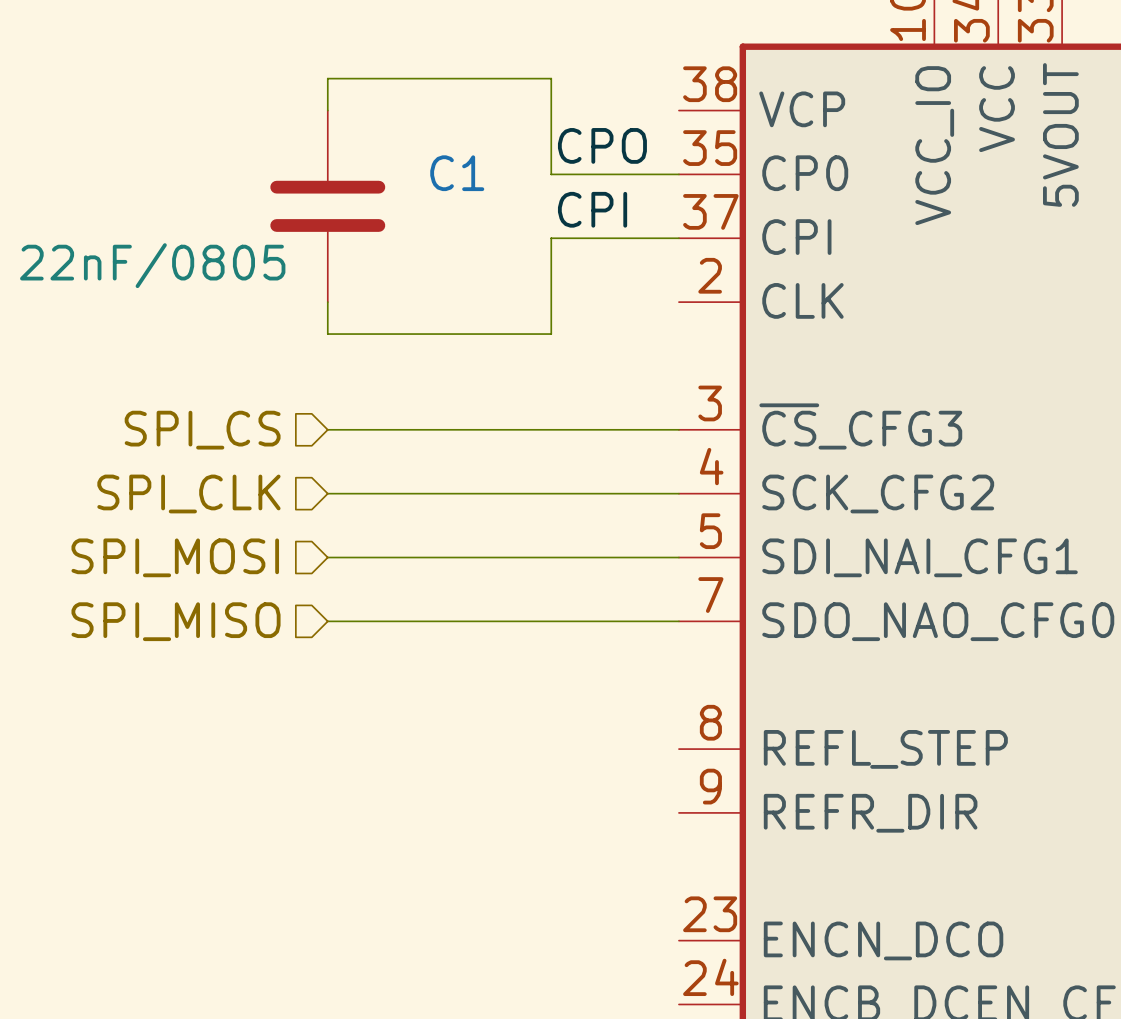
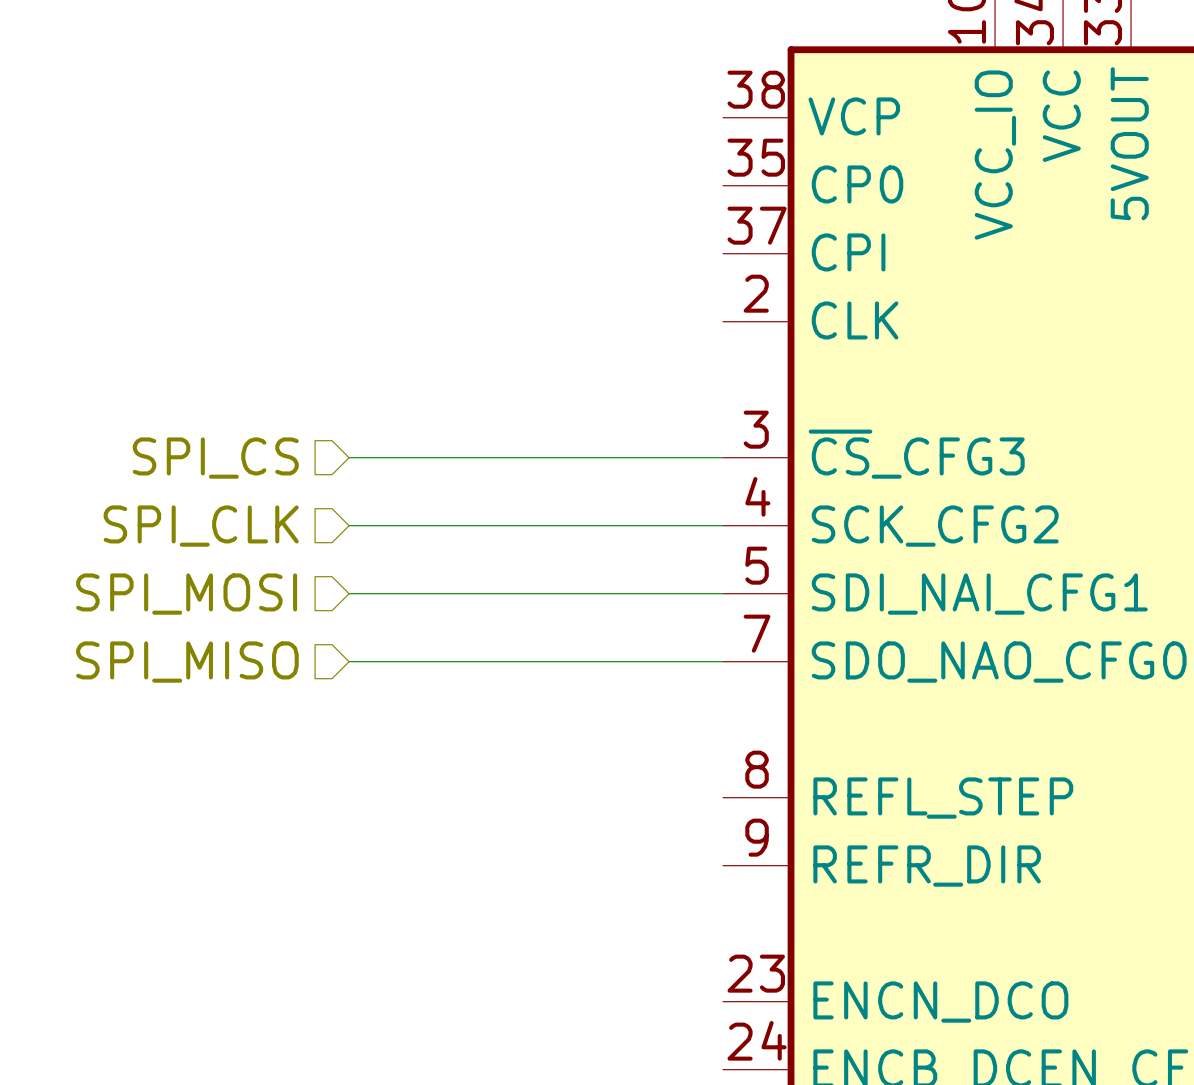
wire: (327, 110) (327, 78) (551, 78) (551, 174) (678, 174) -> none
label: CPO (602, 145) -> none
C1: 22nF/0805 (327, 206) -> none
label: CPI (592, 209) -> none
wire: (678, 238) (551, 238) (551, 334) (327, 334) (327, 302) -> none

